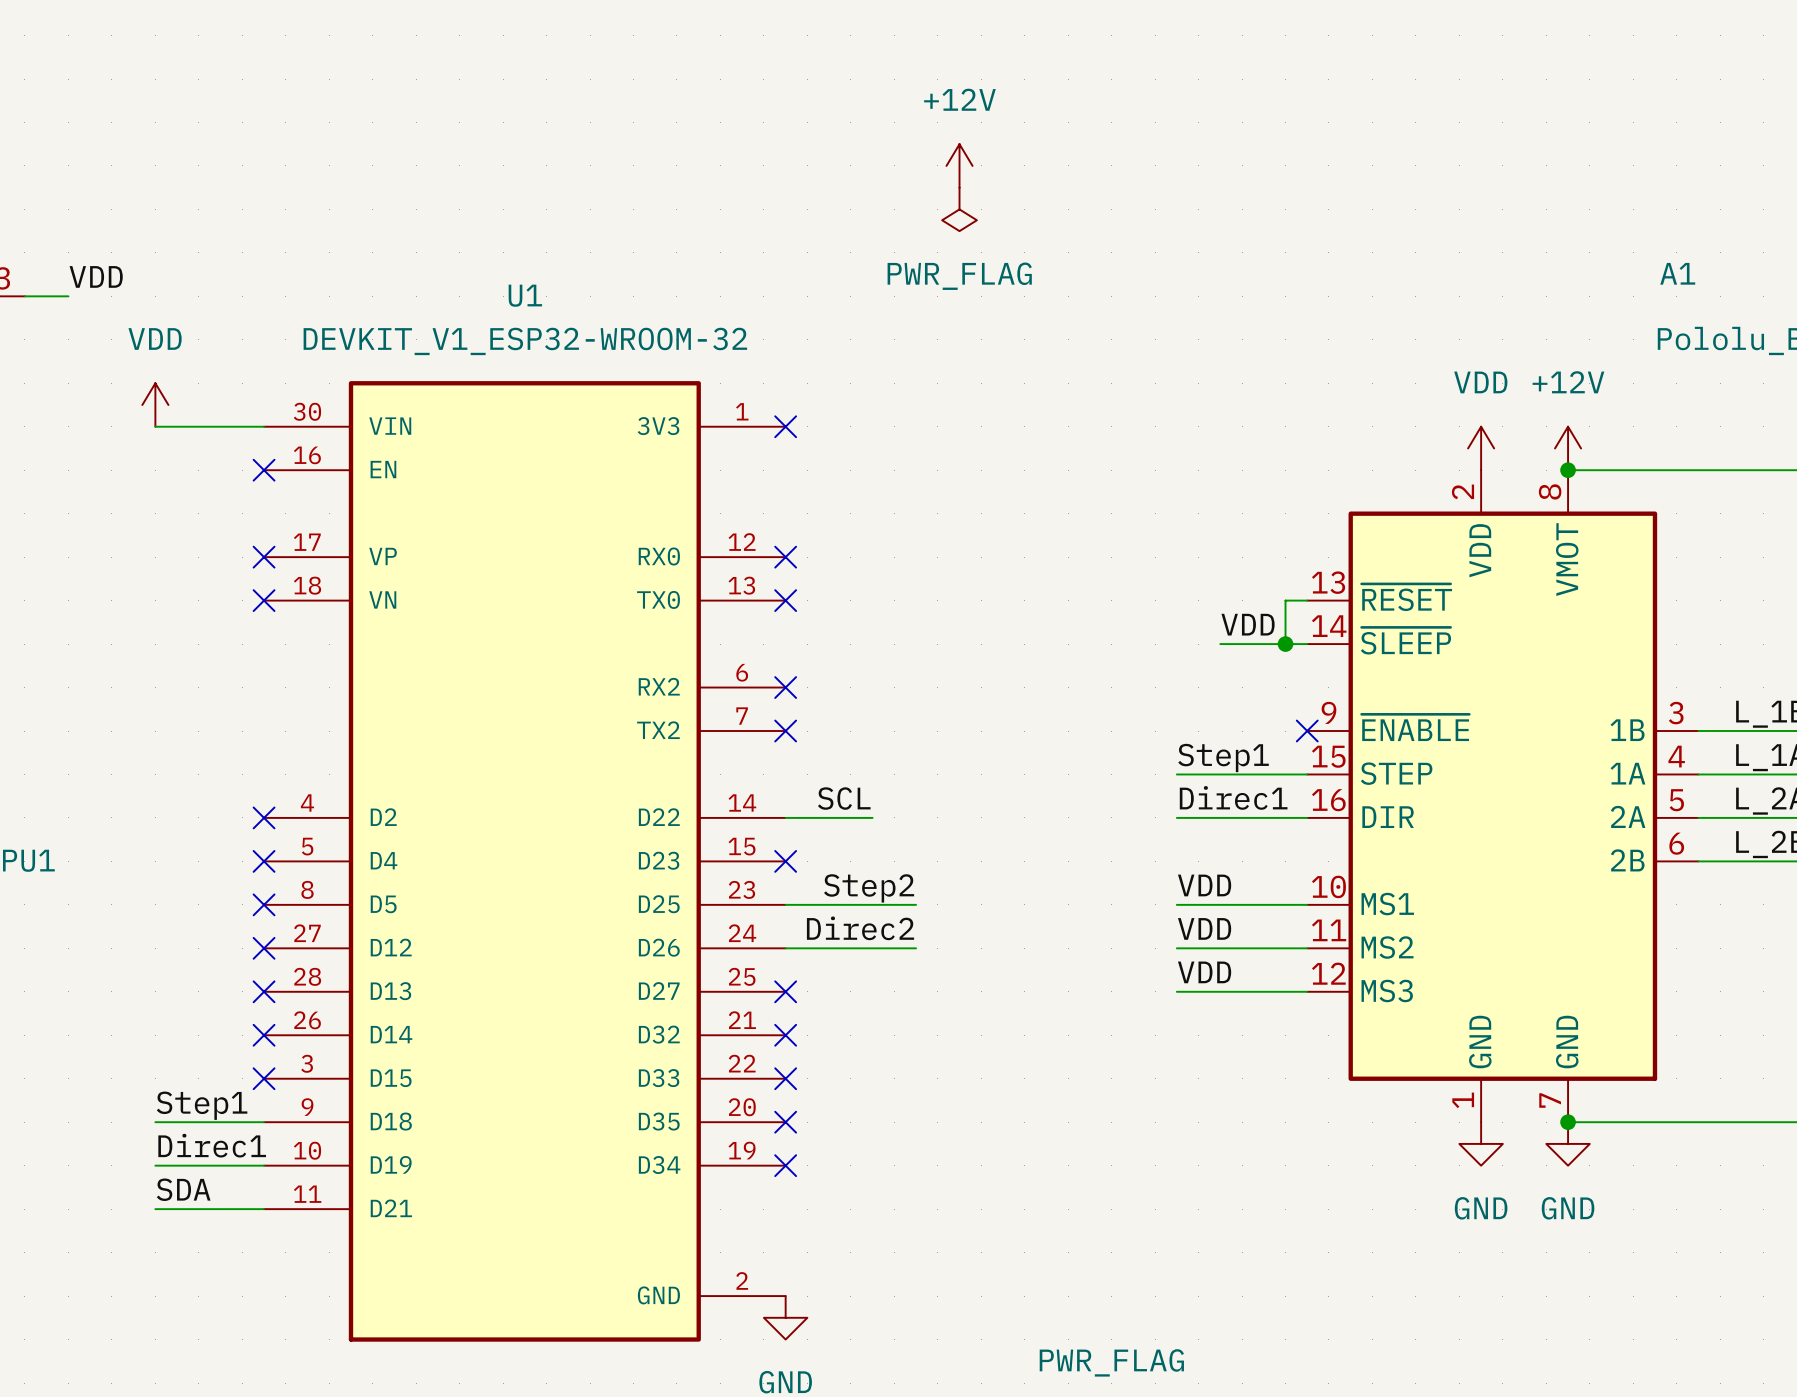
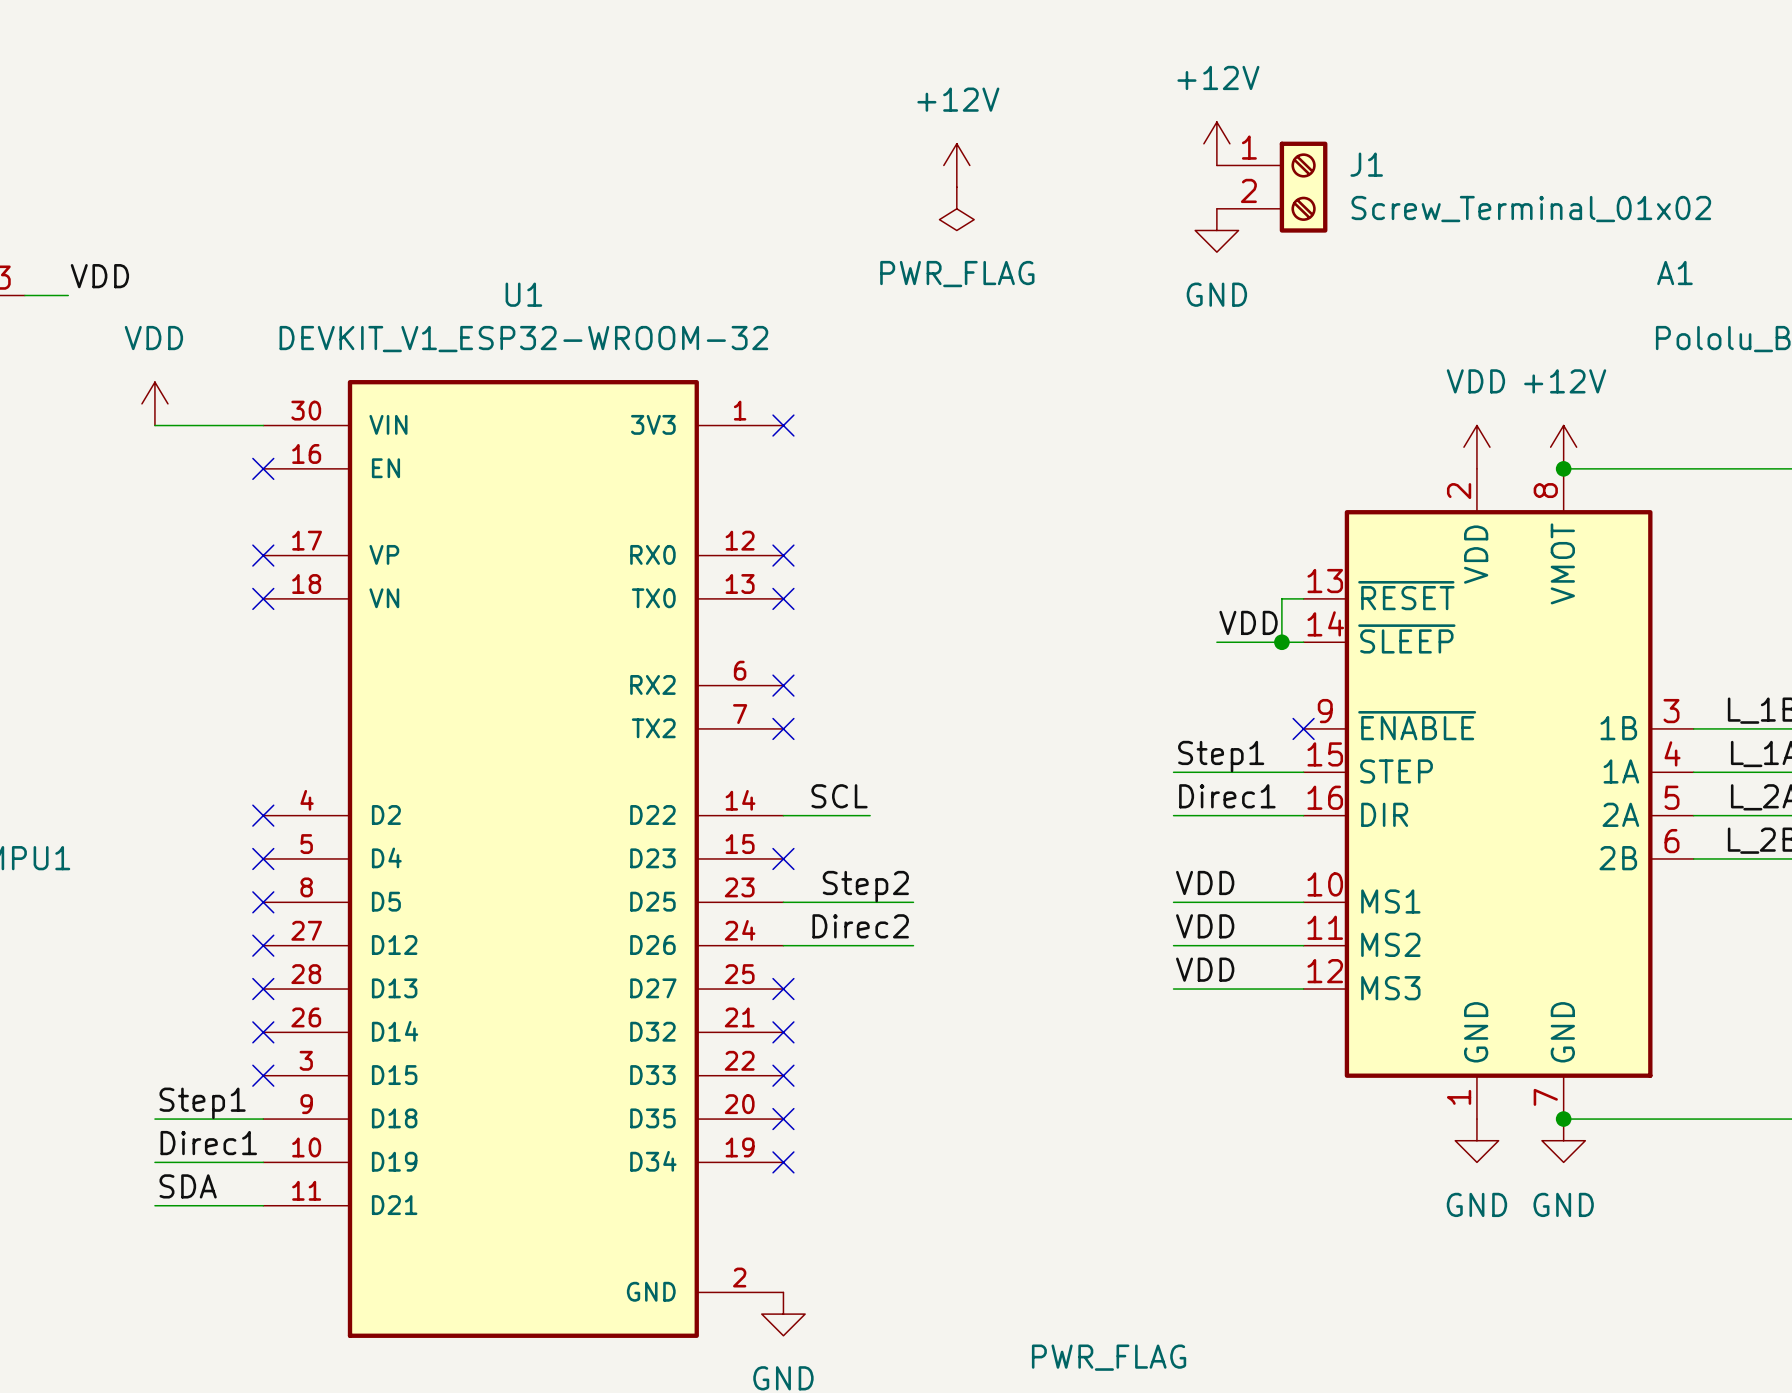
power symbol: none -> +12V (1216, 143)
J1: none -> Screw_Terminal_01x02 (1272, 187)
power symbol: none -> GND (1216, 230)

